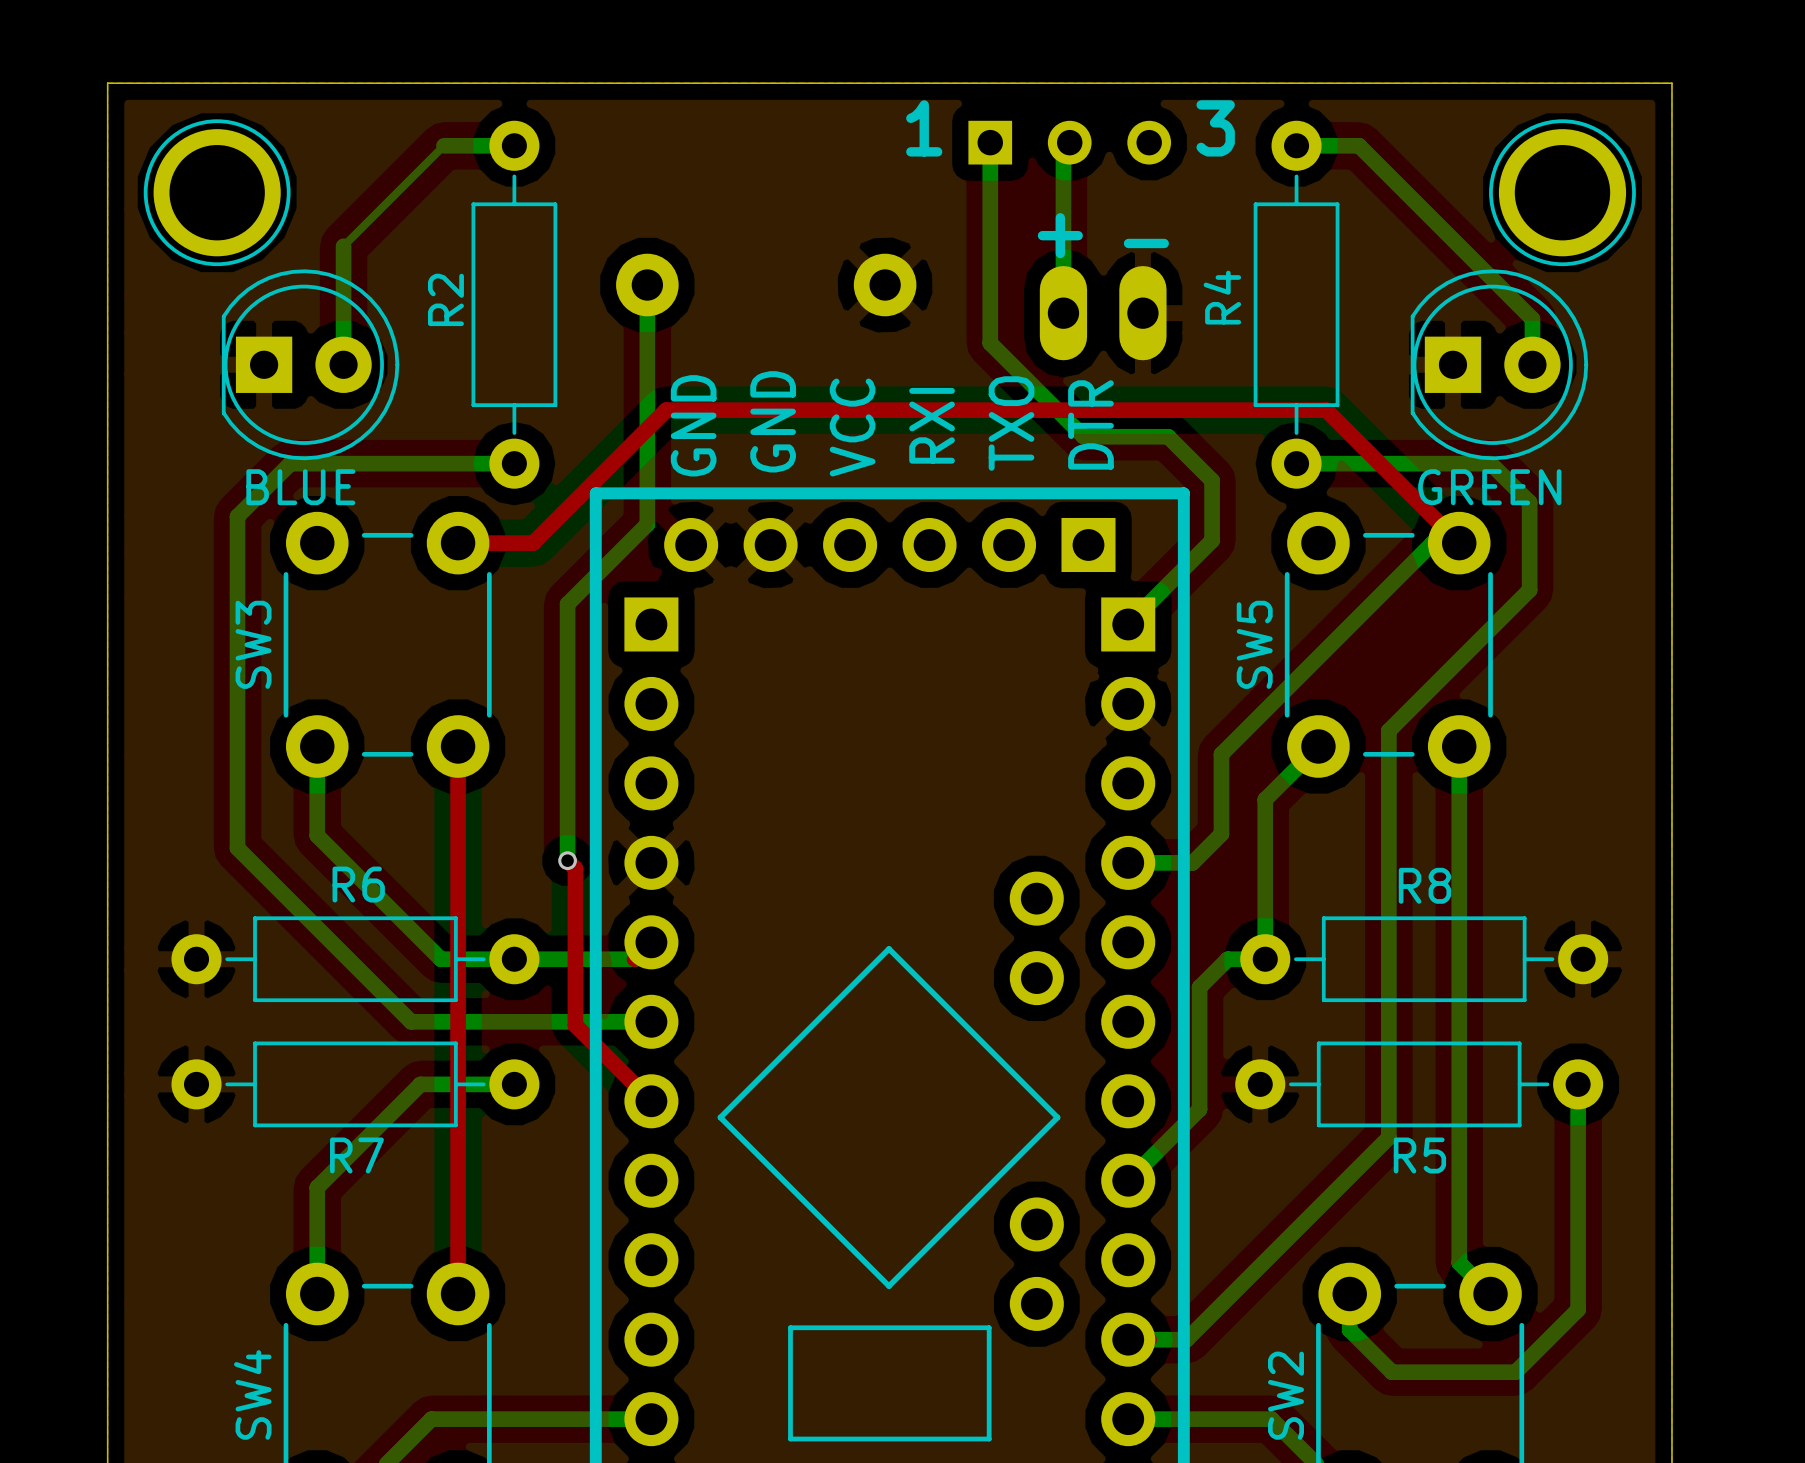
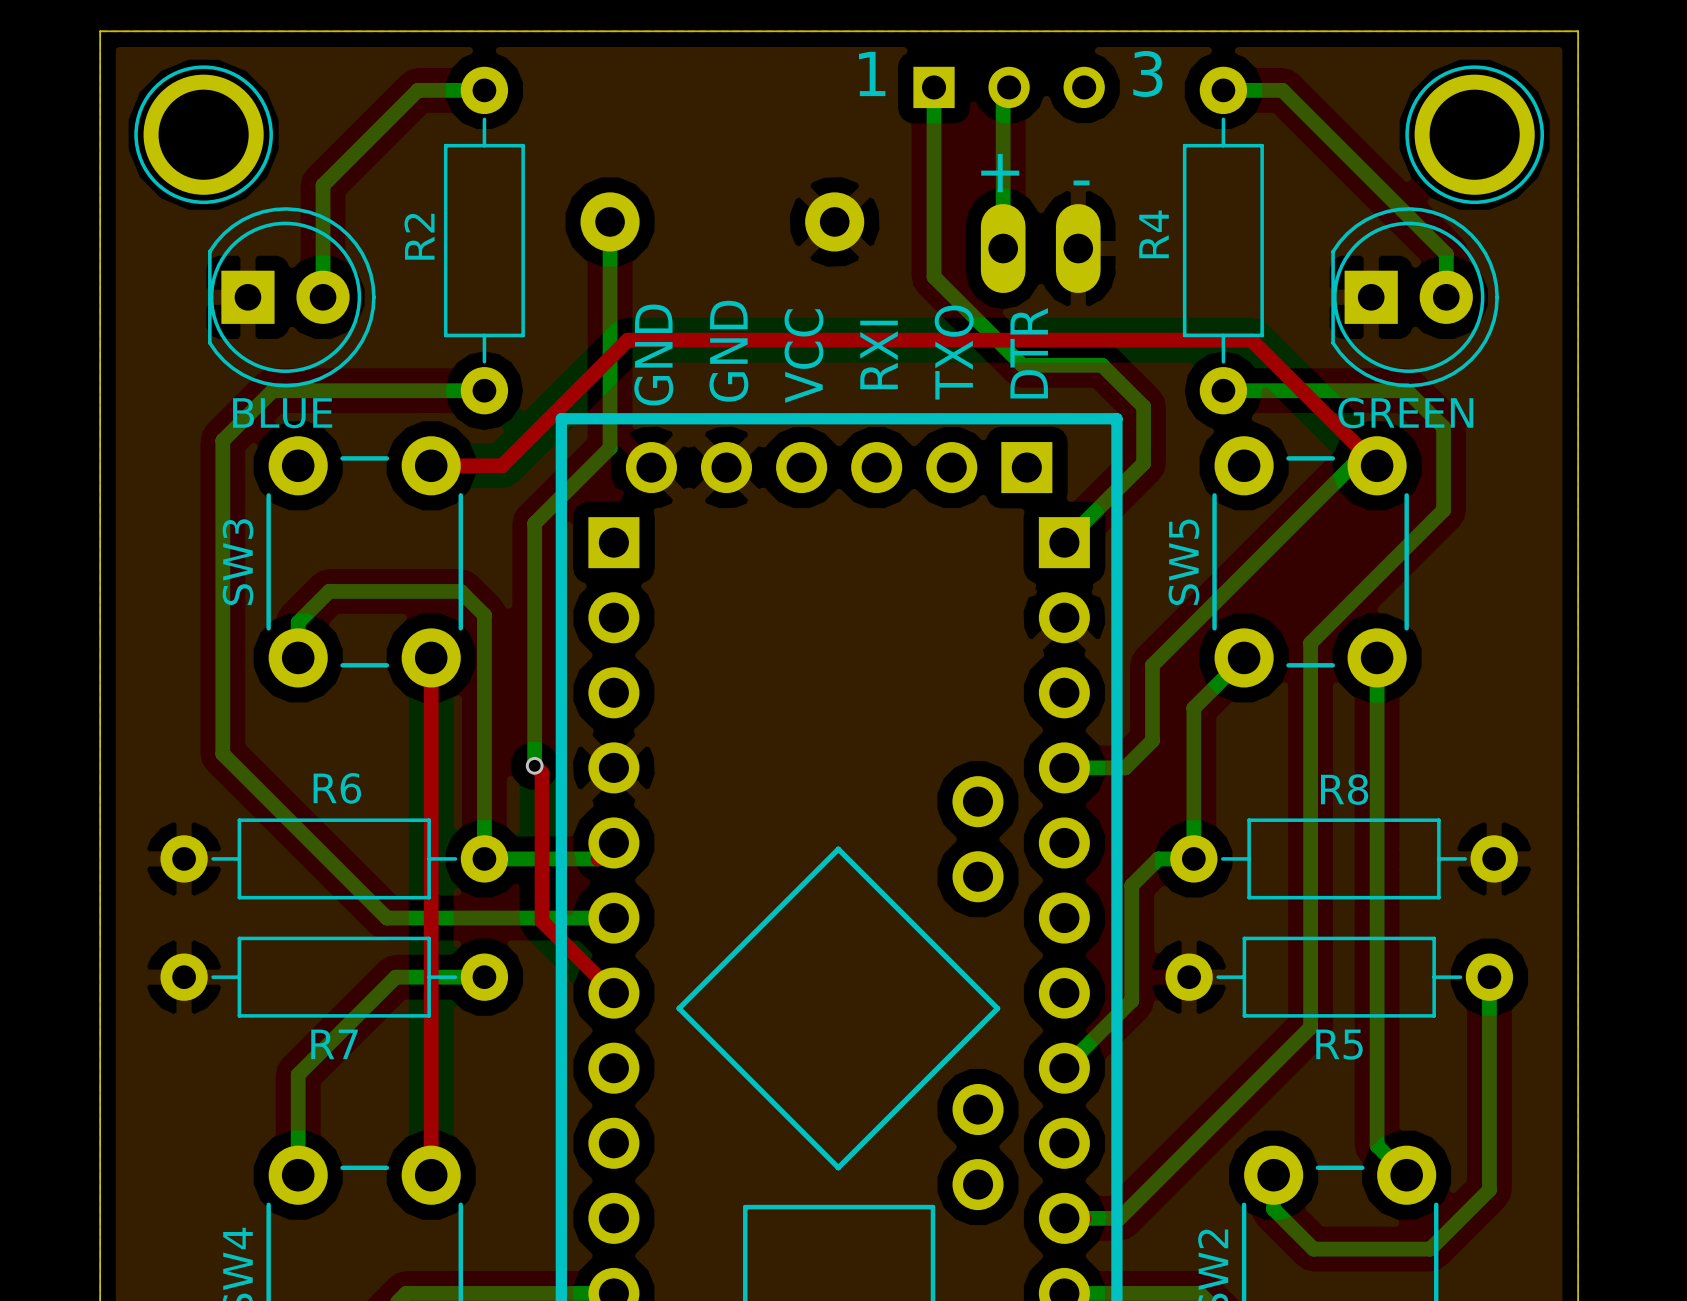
bottom track width: thin (443, 145) (343, 246) -> thick (417, 90) (323, 185)
bottom track: (317, 746) (317, 835) (440, 959) (514, 959) -> (298, 657) (298, 622) (329, 591) (460, 591) (484, 615) (484, 858)

